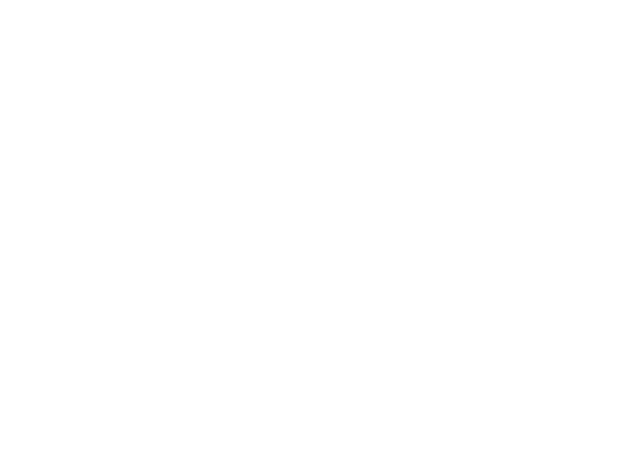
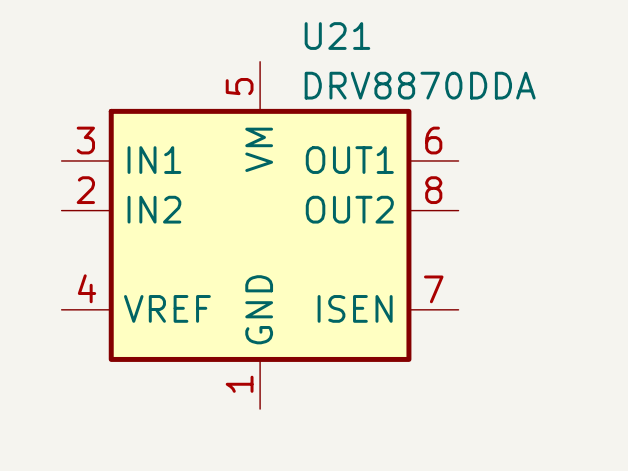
U21: none -> DRV8870DDA (260, 235)

